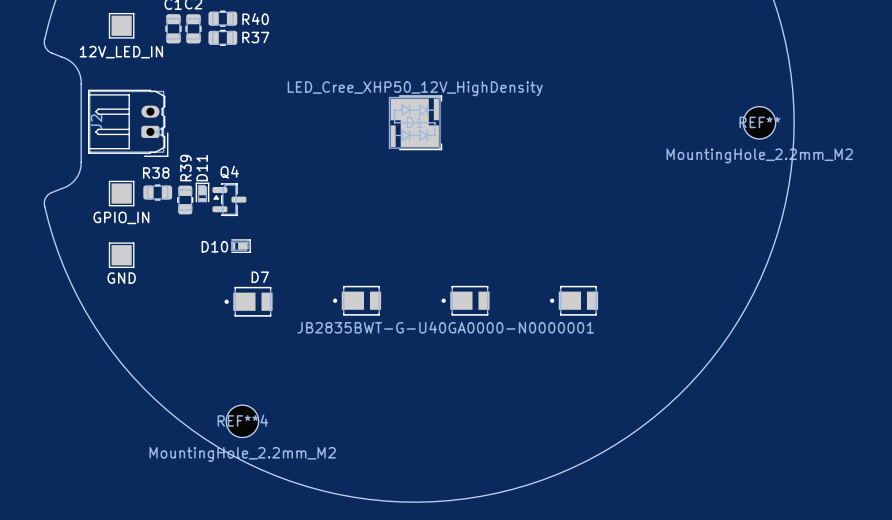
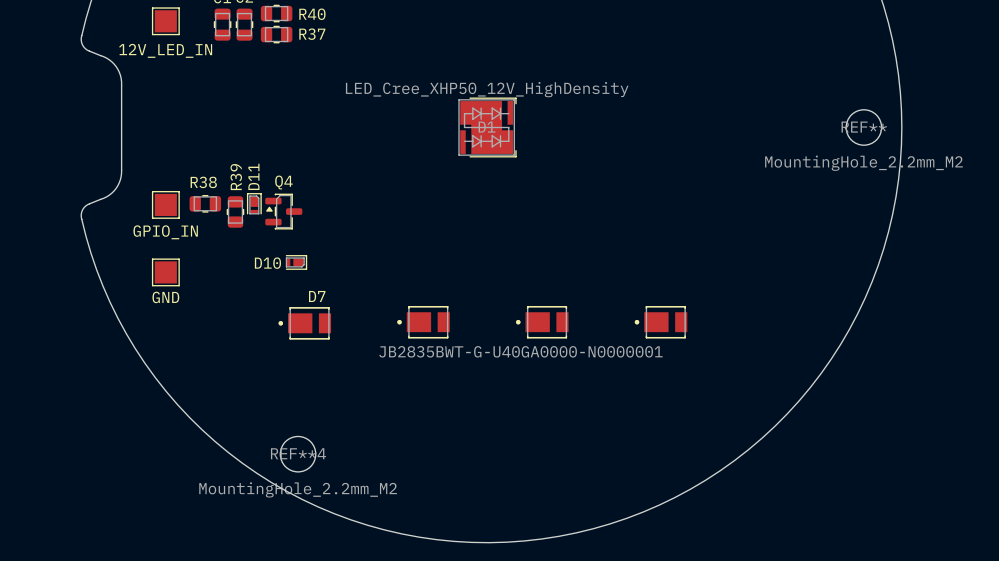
J2: (128, 123) -> none

